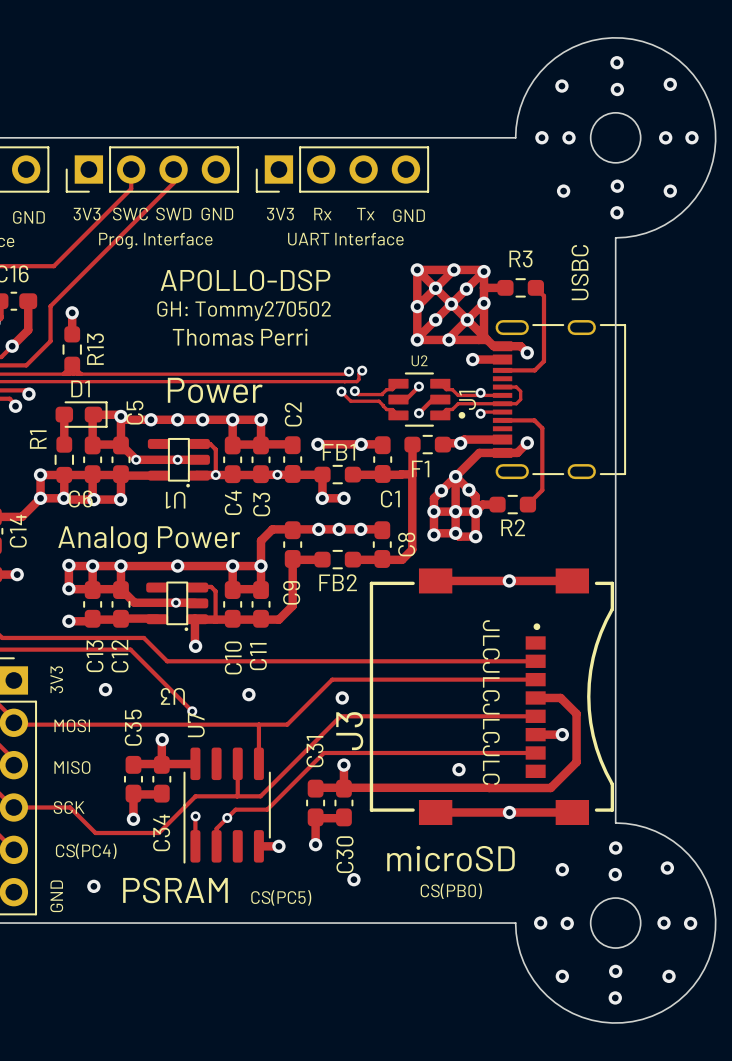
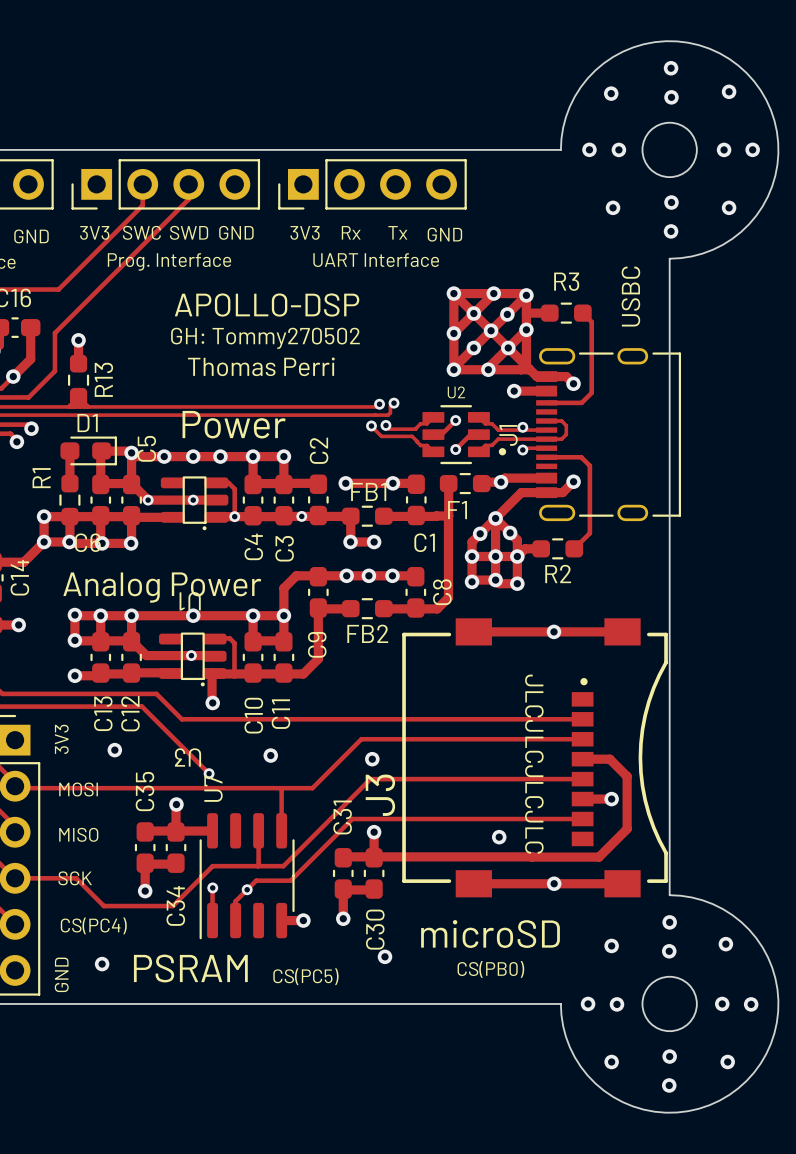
U1 name position: U1 (175, 500) -> U1 (190, 601)

